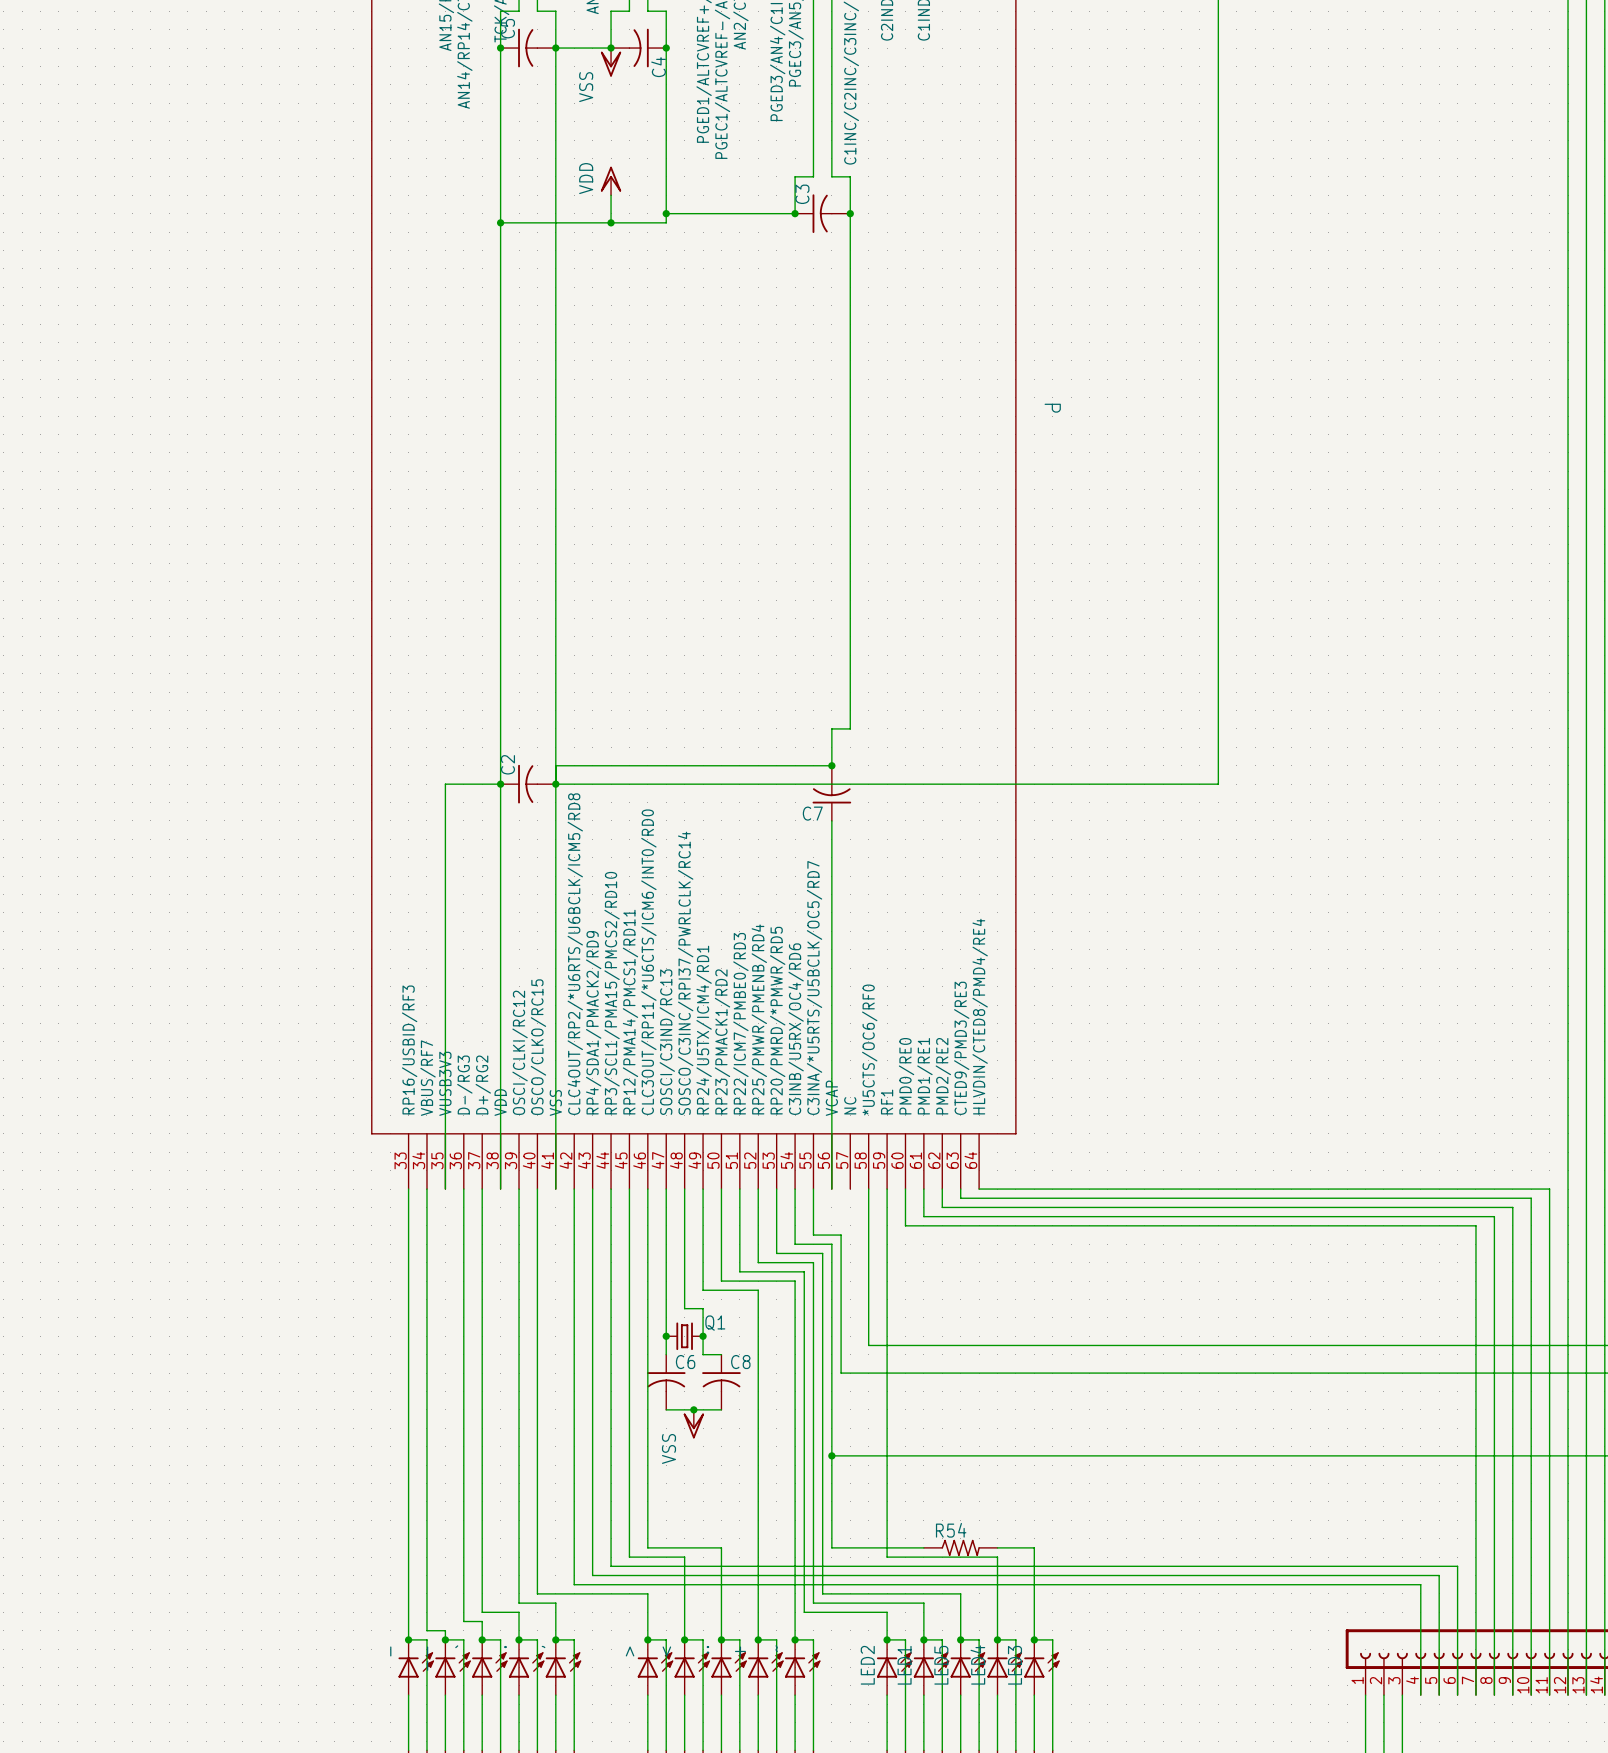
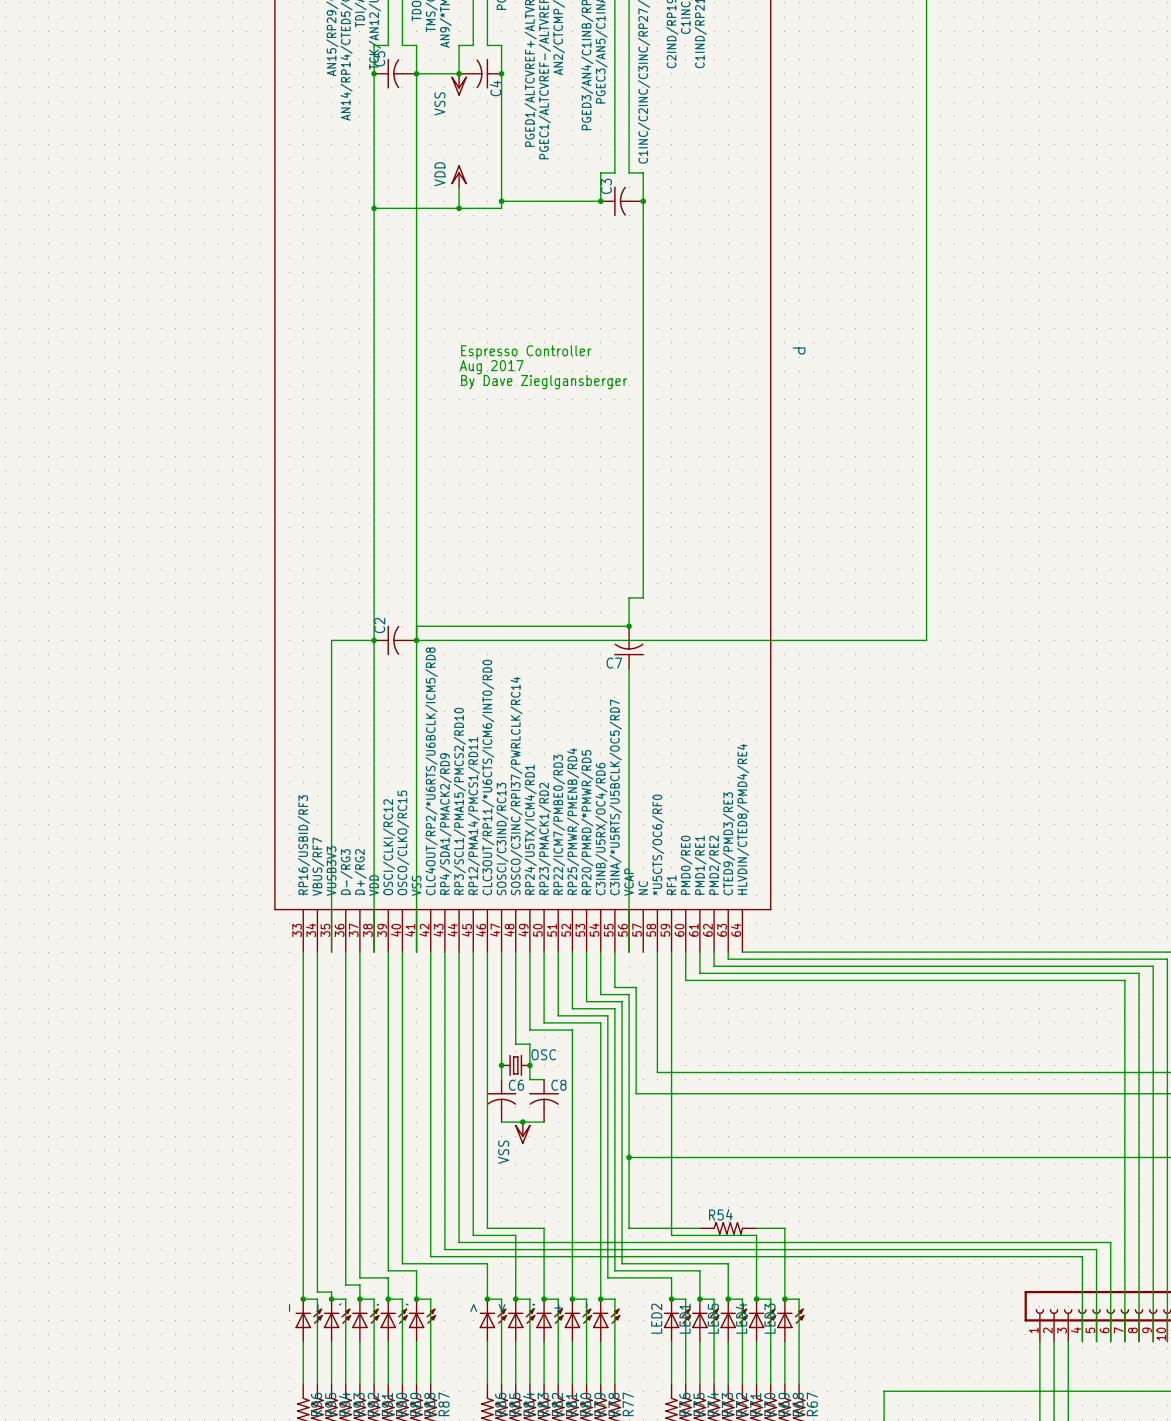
text: none -> Espresso Controller (526, 352)
text: none -> Aug 2017 (491, 367)
text: none -> By Dave Zieglgansberger (544, 382)
Q1 name: Q1 (715, 1323) -> OSC (543, 1054)

